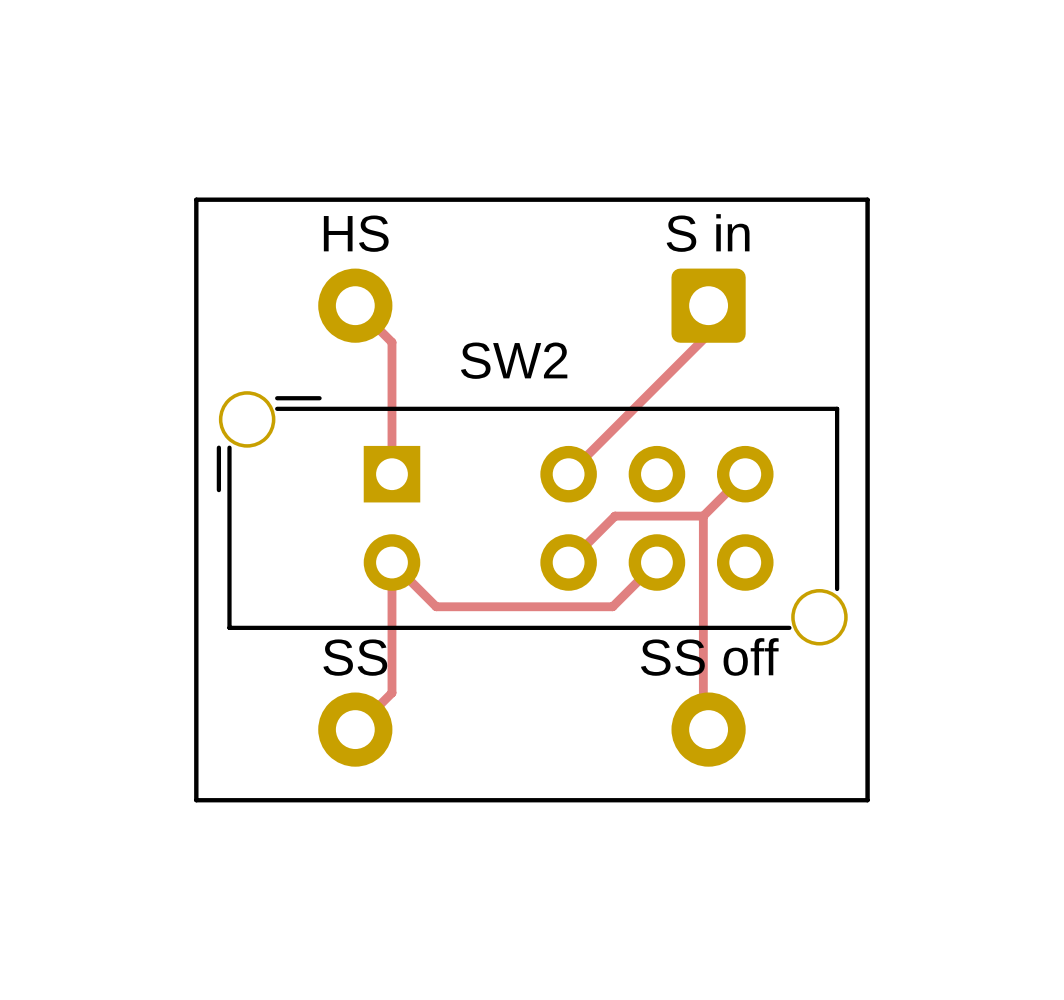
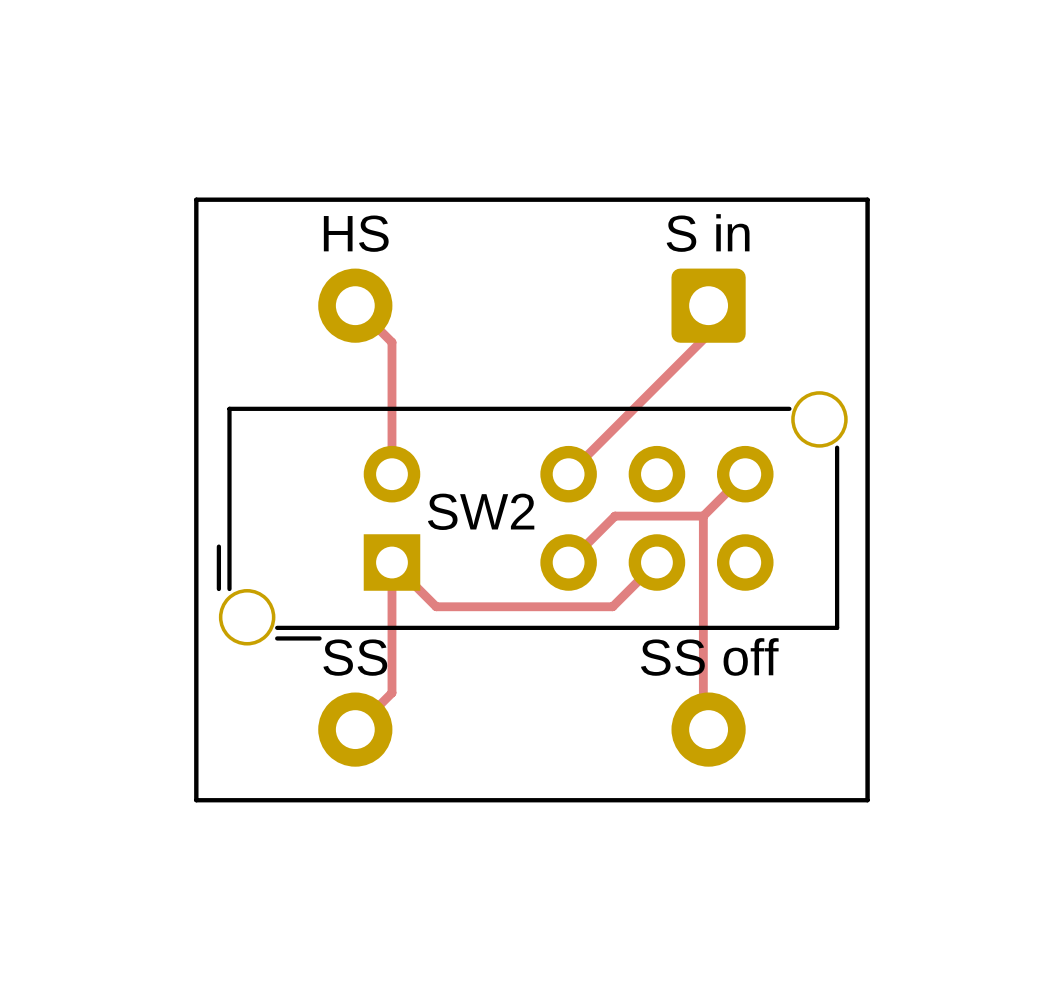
SW2 name position: SW2 (514, 360) -> SW2 (481, 511)
SW2 footprint: [216, 391, 848, 646] -> [216, 391, 848, 646]

